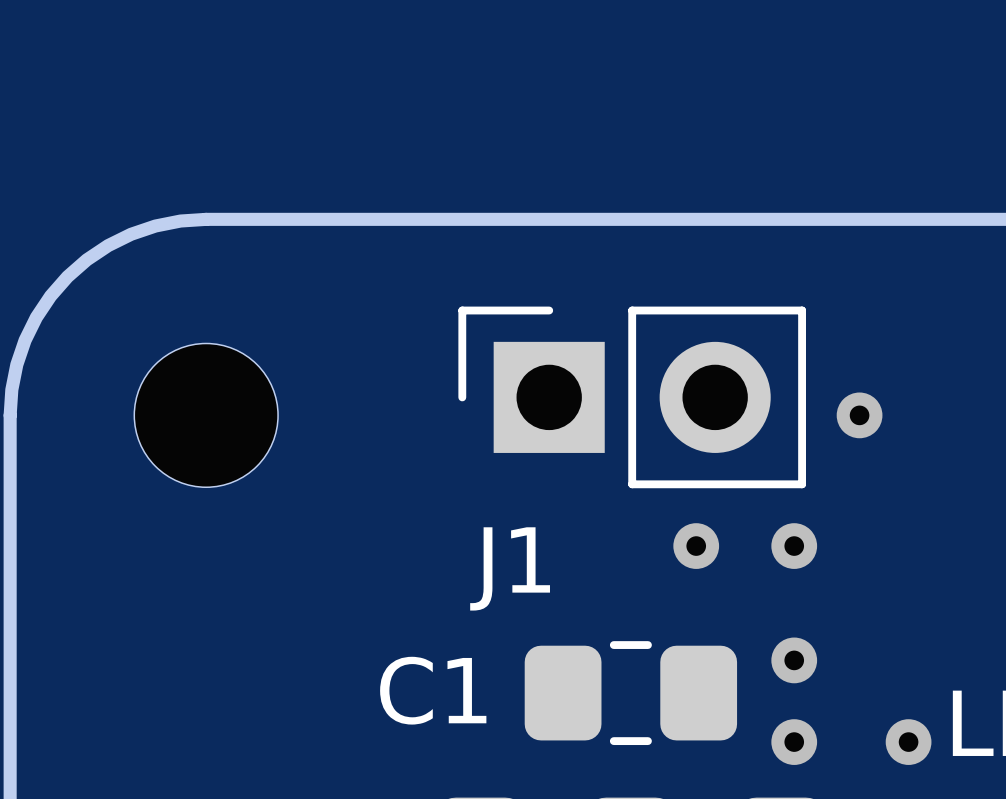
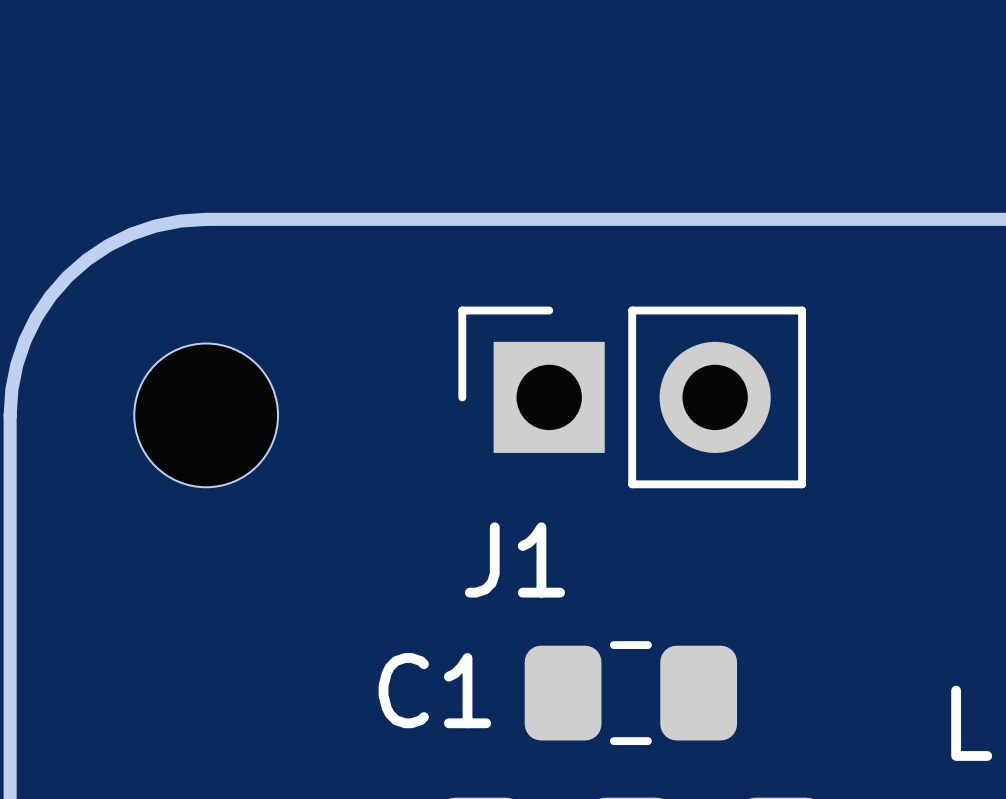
via: (859, 415) -> none
via: (696, 546) -> none
via: (794, 546) -> none
via: (794, 660) -> none
via: (794, 742) -> none
via: (908, 742) -> none

